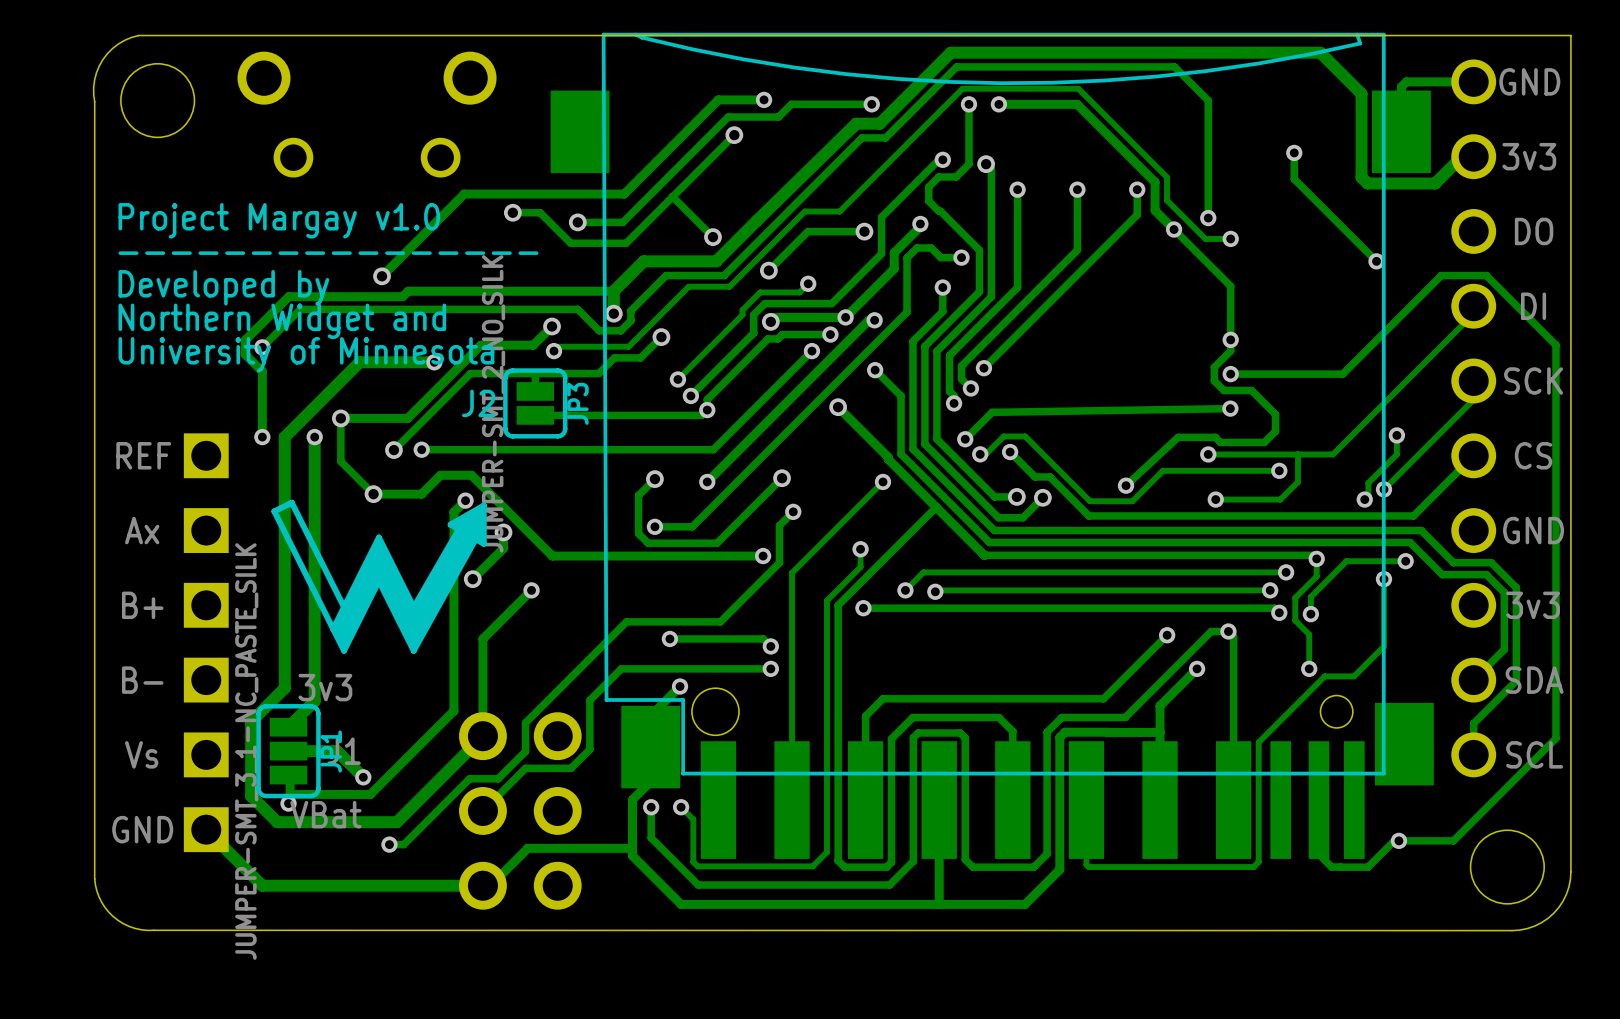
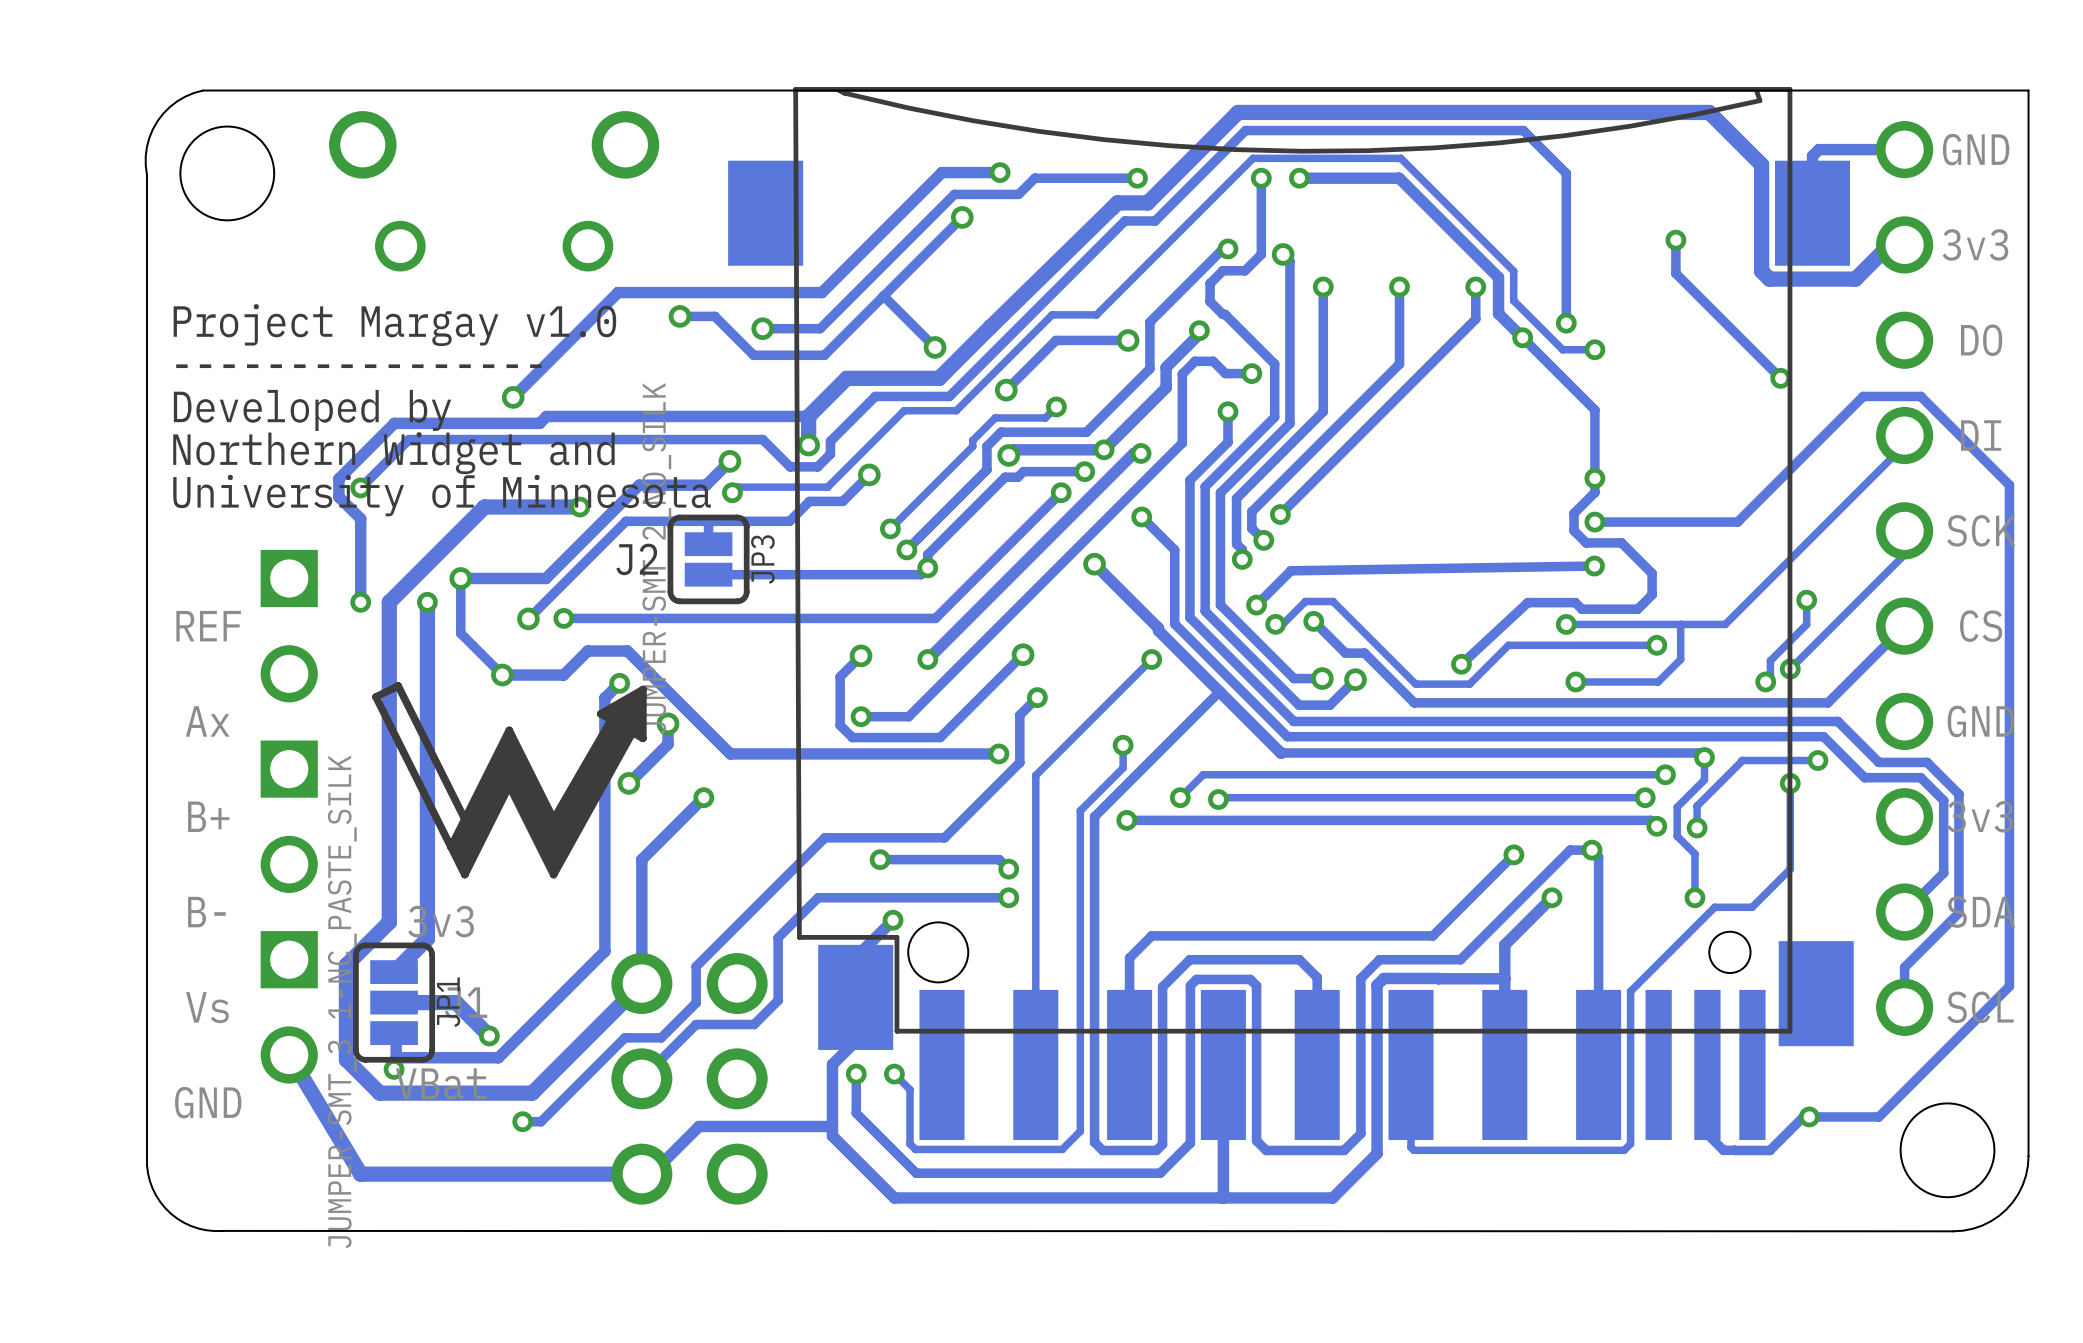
part: none -> (289, 626)
part: (206, 493) -> none
part: none -> (289, 816)
part: (206, 642) -> none
part: none -> (289, 1007)
part: (206, 792) -> none
track: (206, 829) (262, 885) -> (289, 1055) (360, 1174)

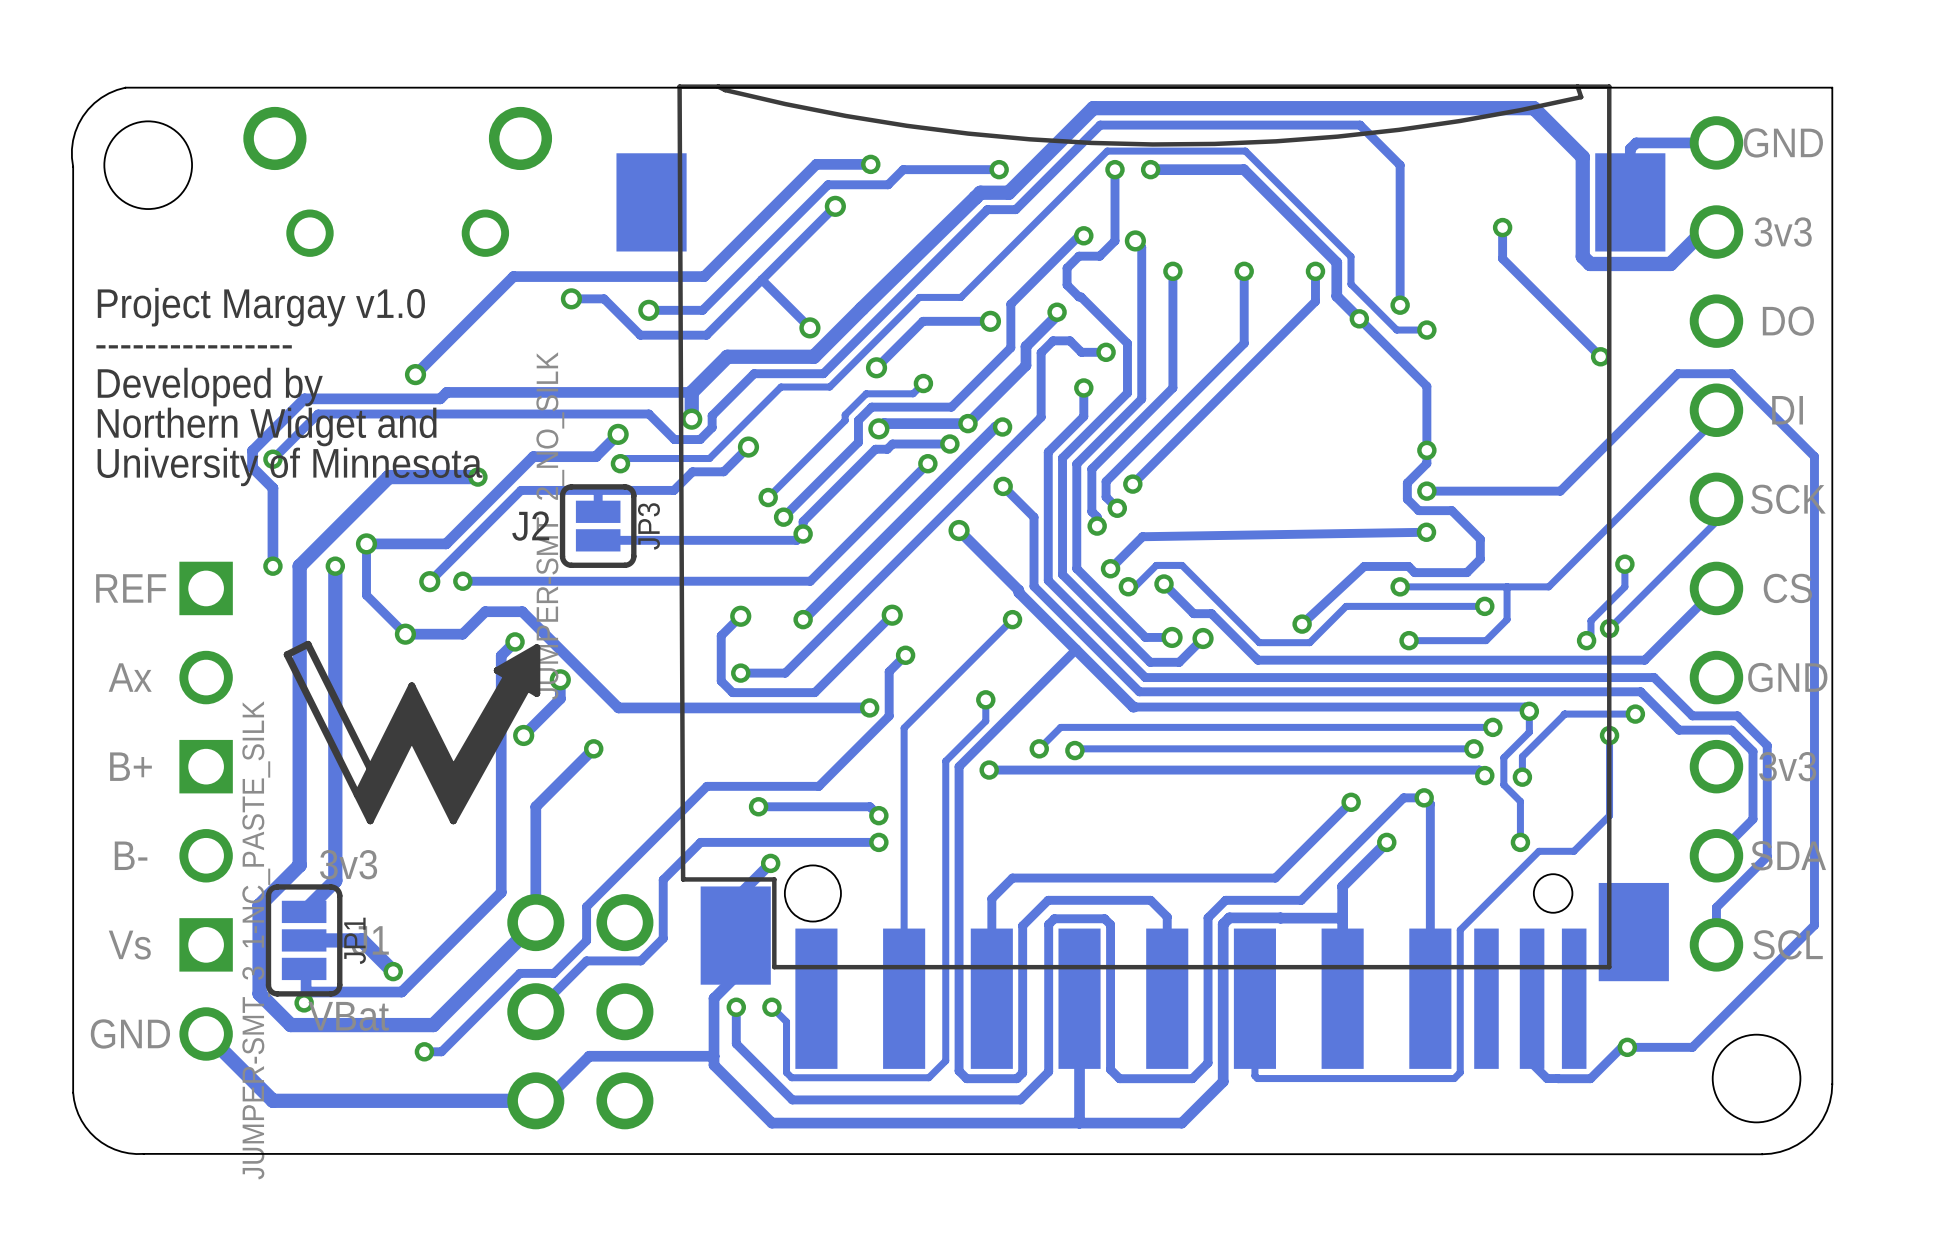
part position: (289, 626) -> (206, 633)
part position: (289, 816) -> (206, 811)
part position: (289, 1007) -> (206, 989)
track: (289, 1055) (360, 1174) -> (206, 1033) (272, 1100)

